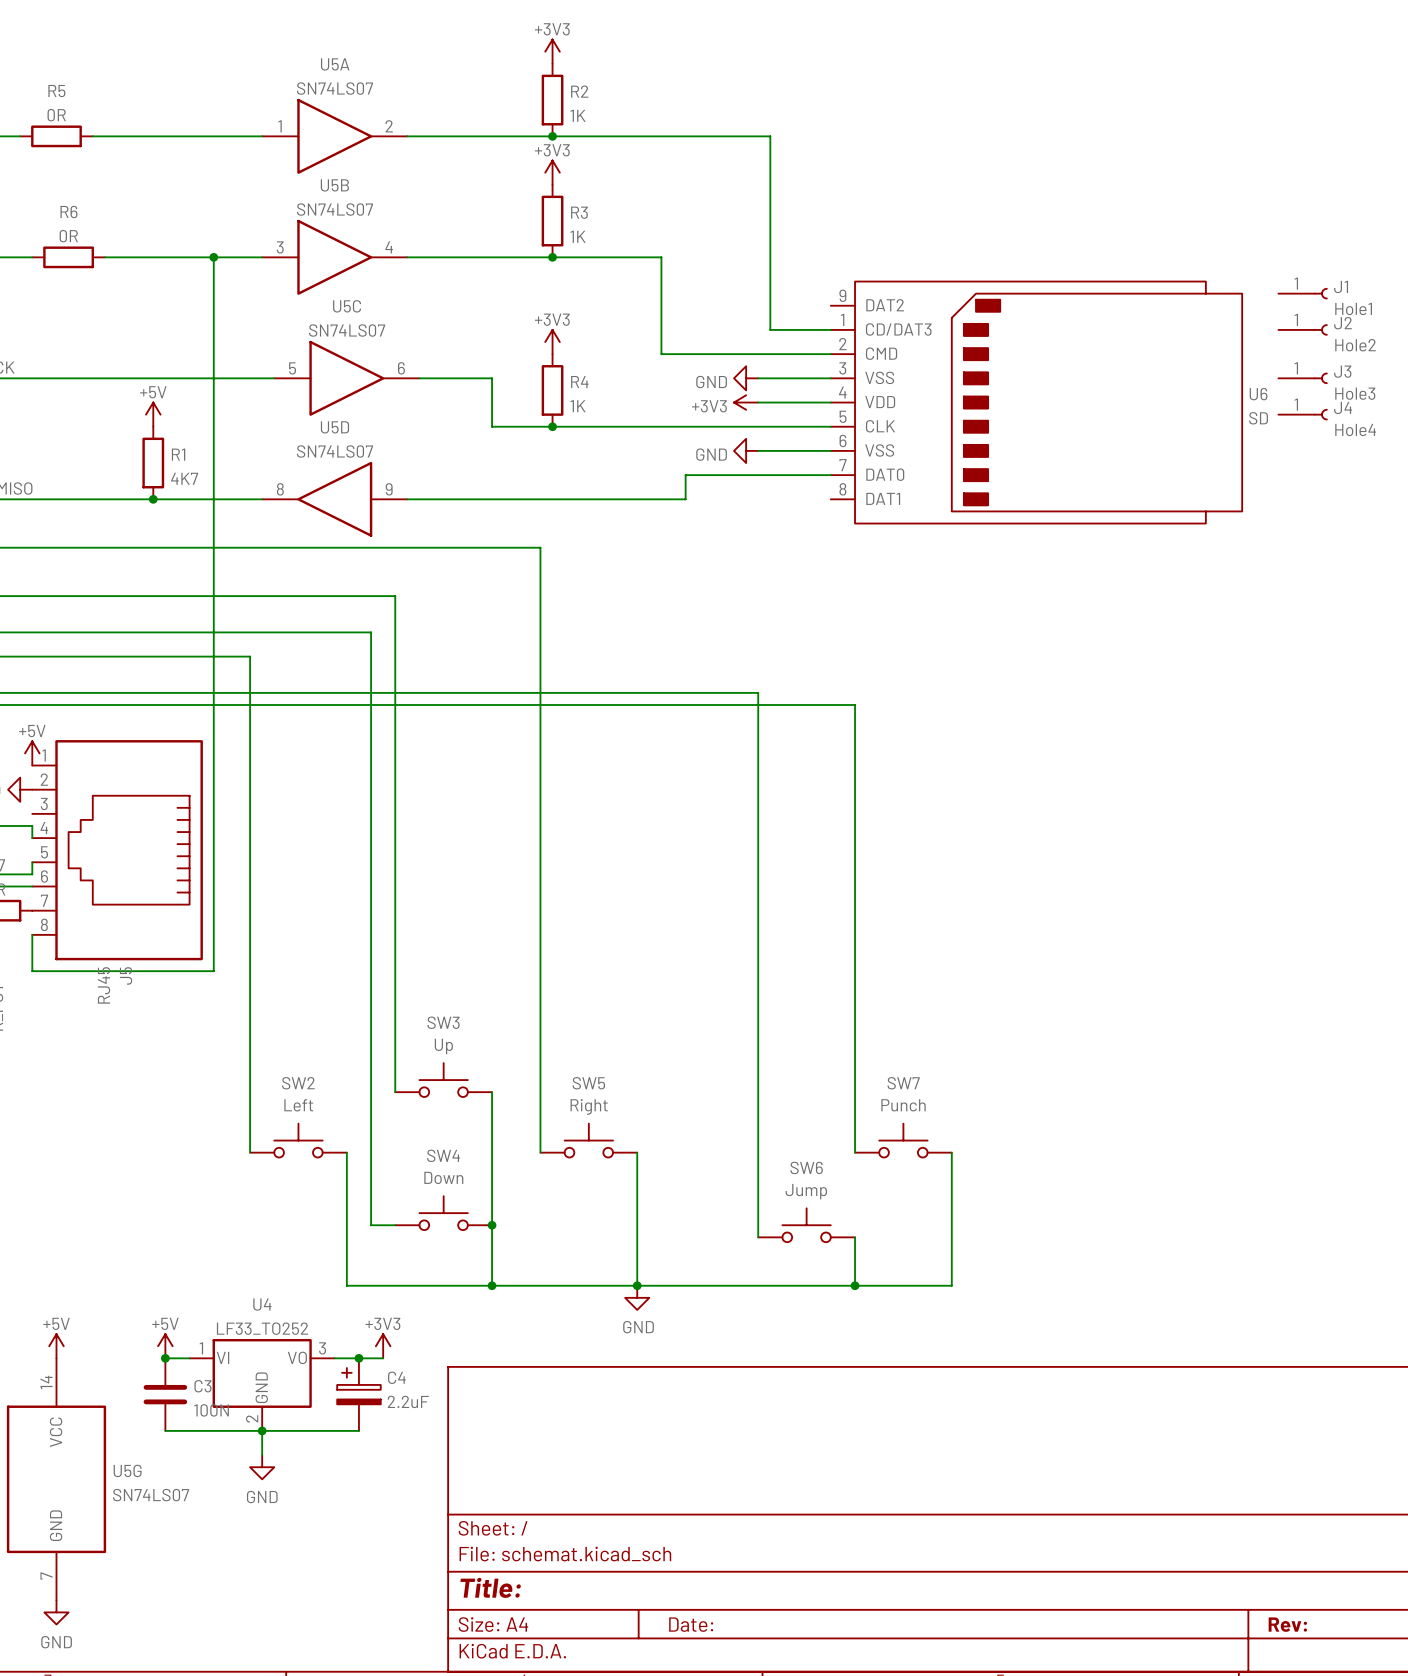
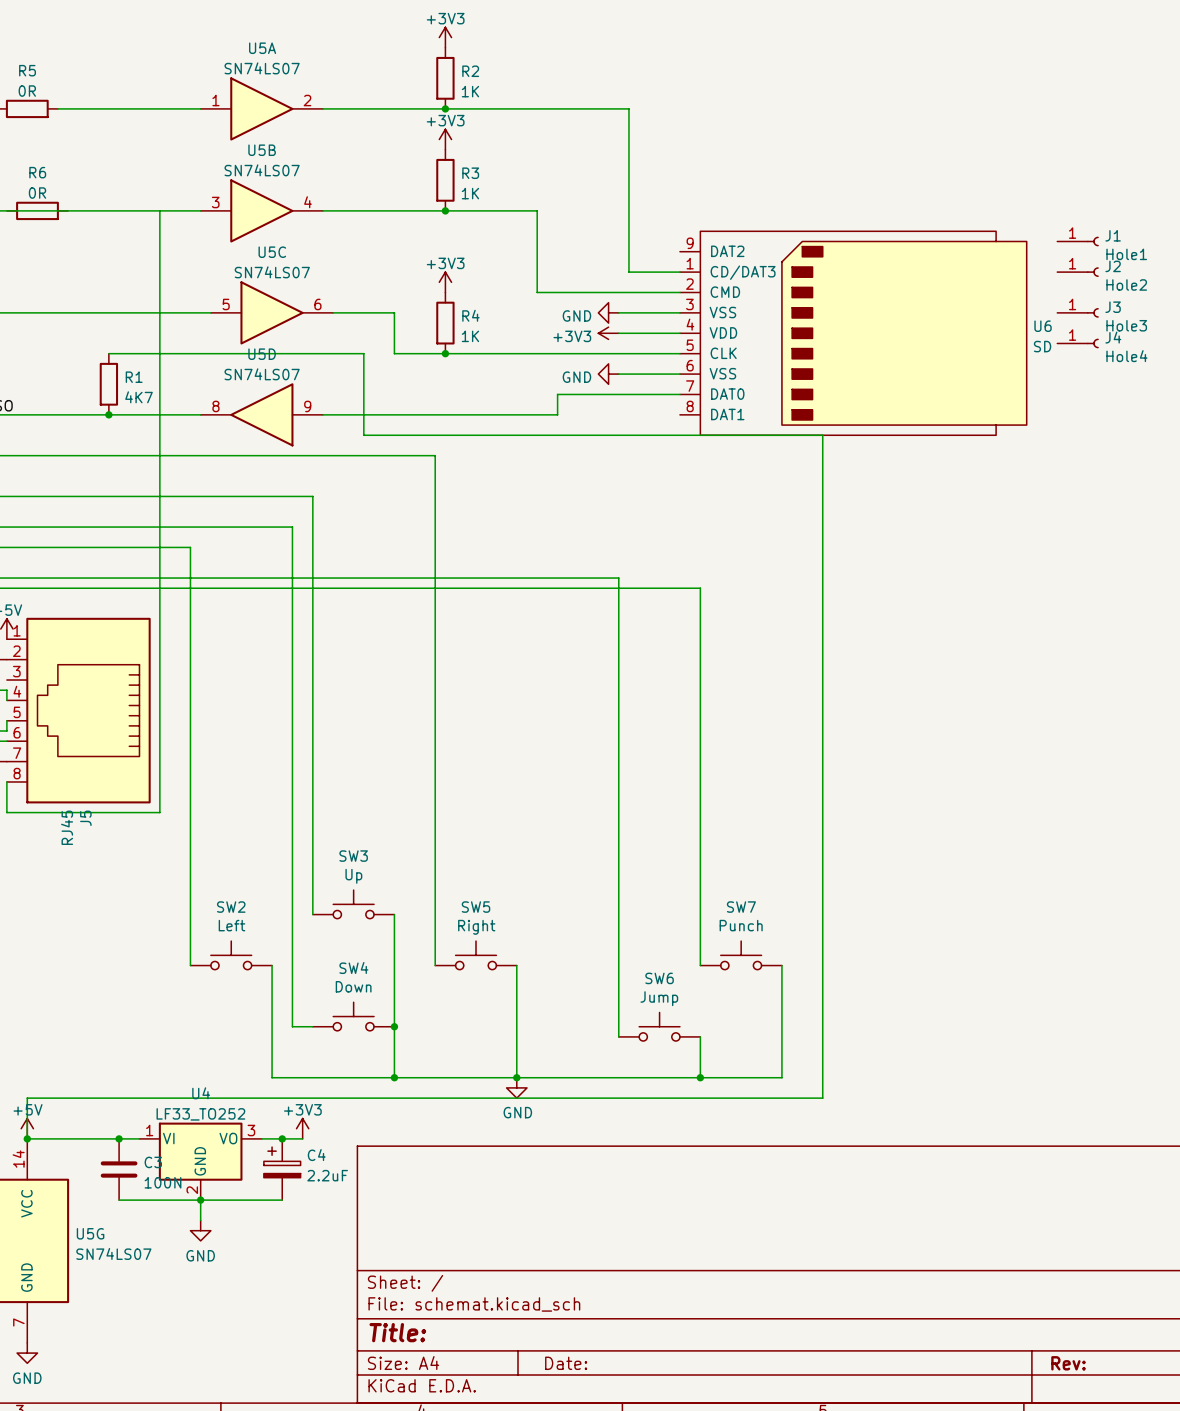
wire: none -> (6, 210) (68, 210)
junction: (213, 257) -> none
power symbol: +5V (153, 414) -> none
wire: none -> (108, 353) (363, 353) (363, 435) (822, 435) (822, 1098) (27, 1098) (27, 1138) (119, 1138)
power symbol: +5V (165, 1346) -> none
junction: none -> (27, 1138)

